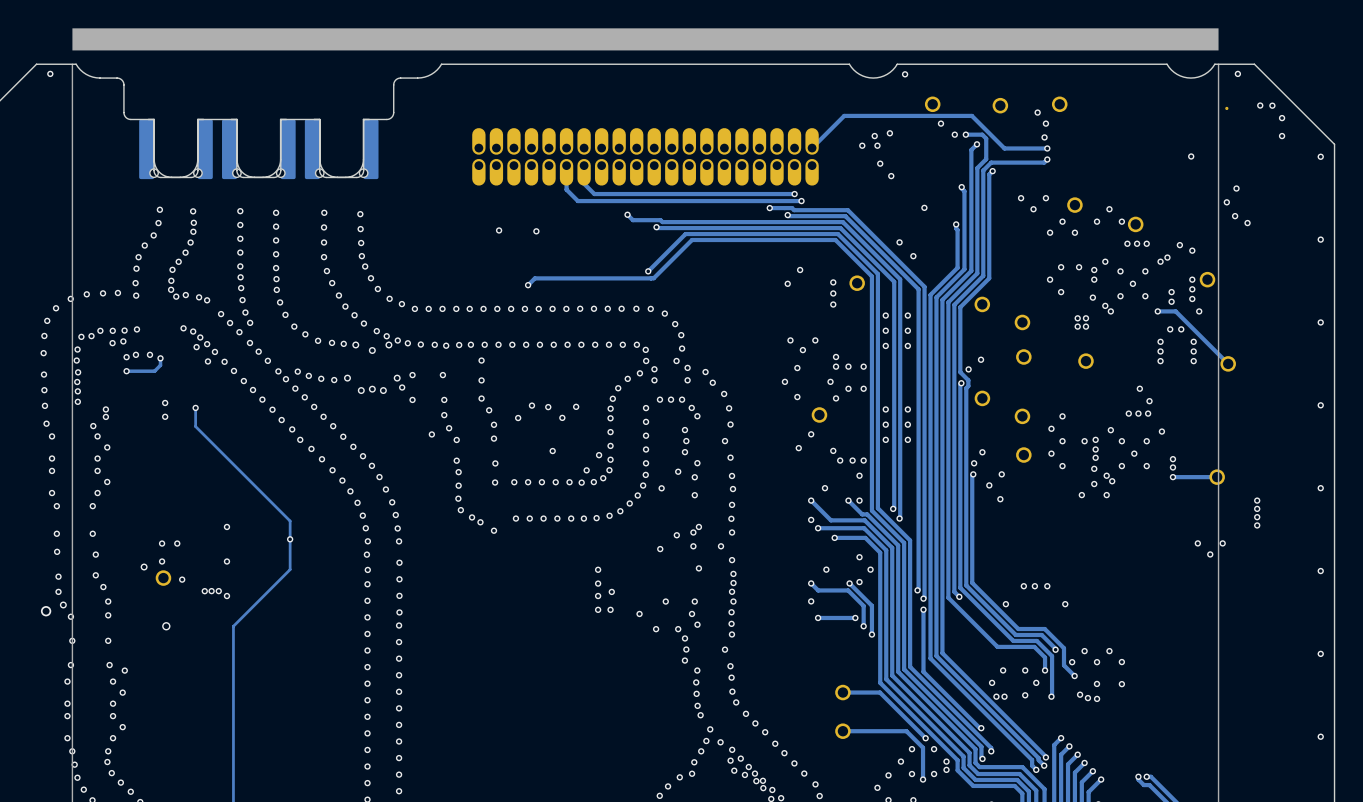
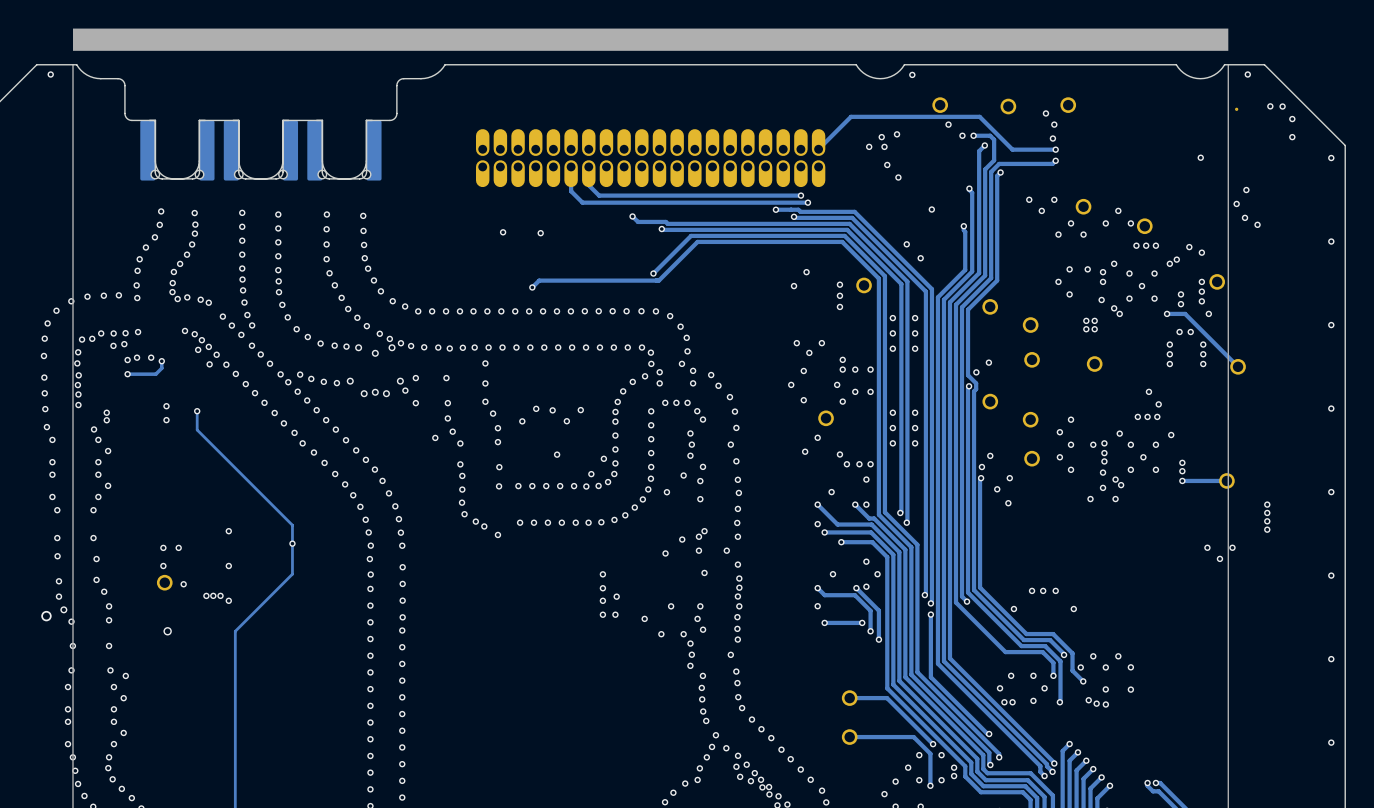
via: (144, 567) -> none

